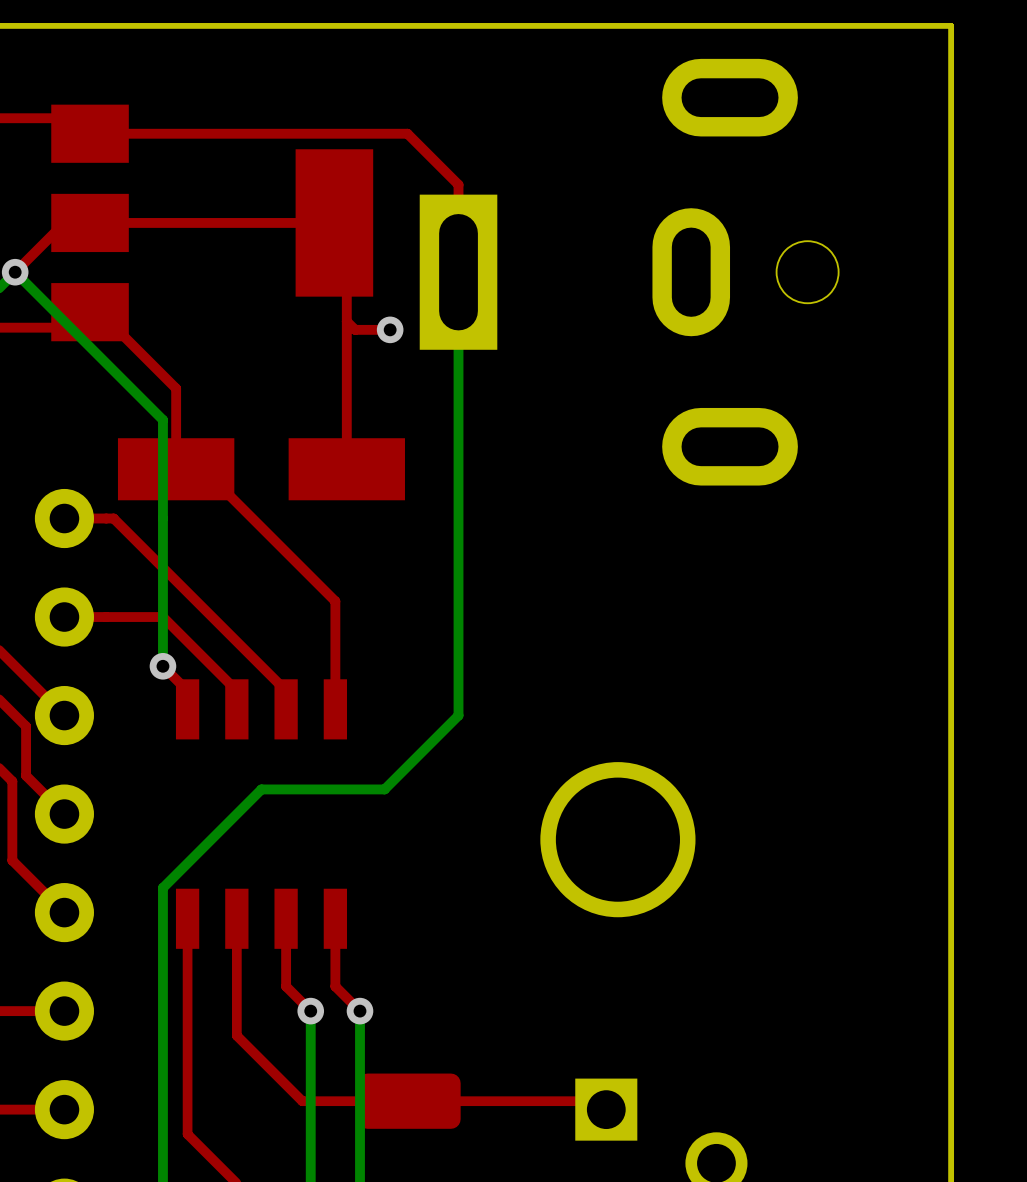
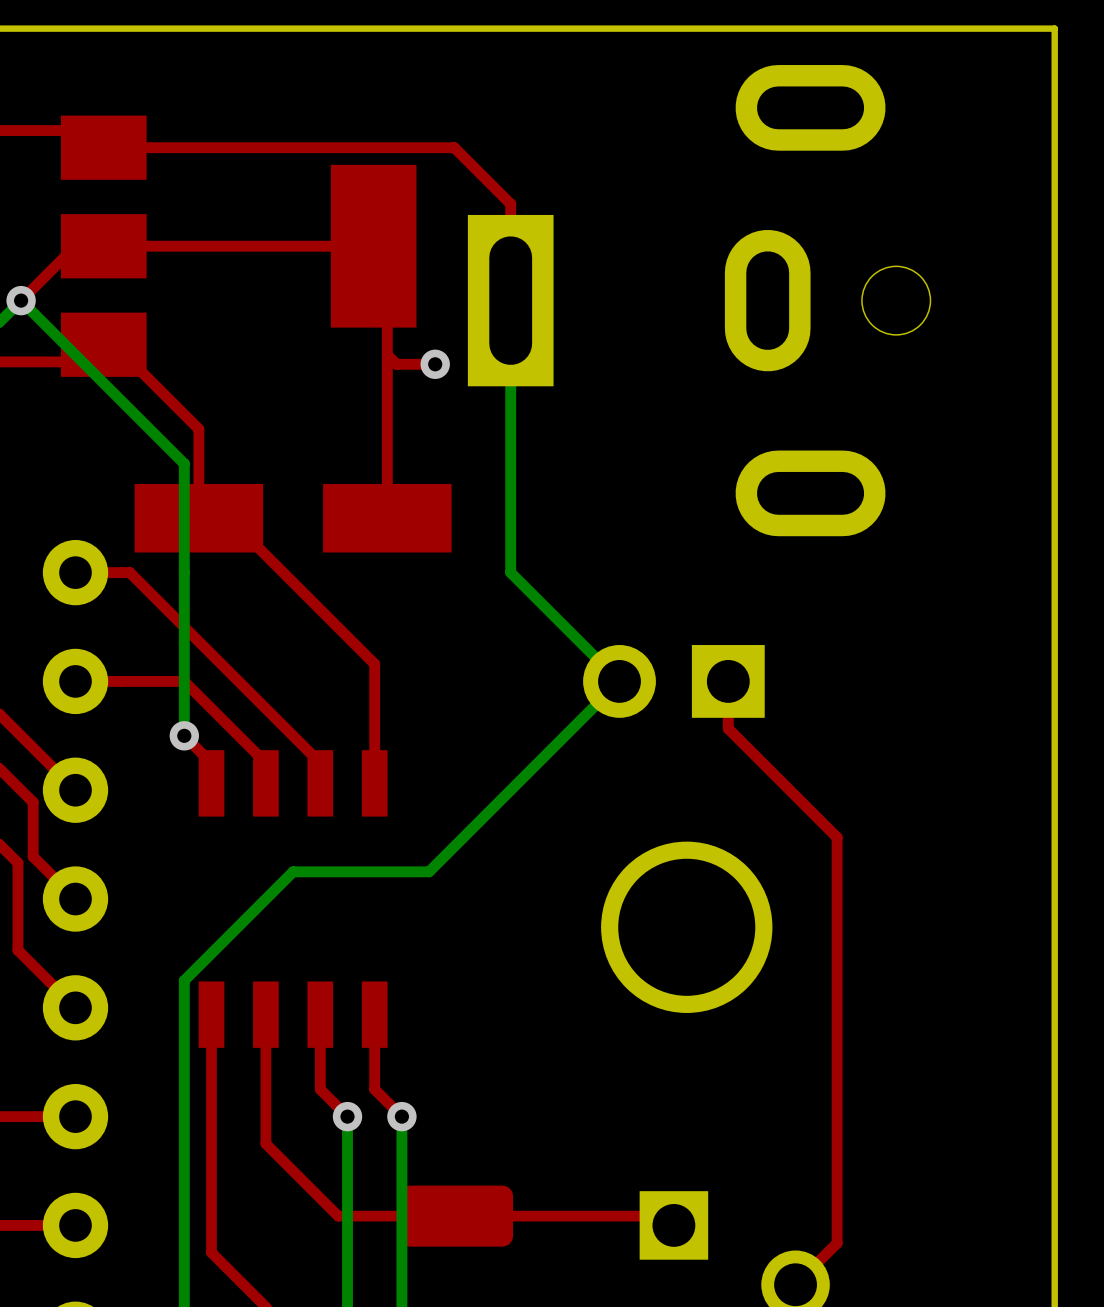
bottom track: (458, 518) (458, 715) -> (510, 572) (619, 681) (510, 790)
part: none -> (673, 681)
top track: none -> (728, 681) (728, 728) (837, 837) (837, 1243) (795, 1284)

